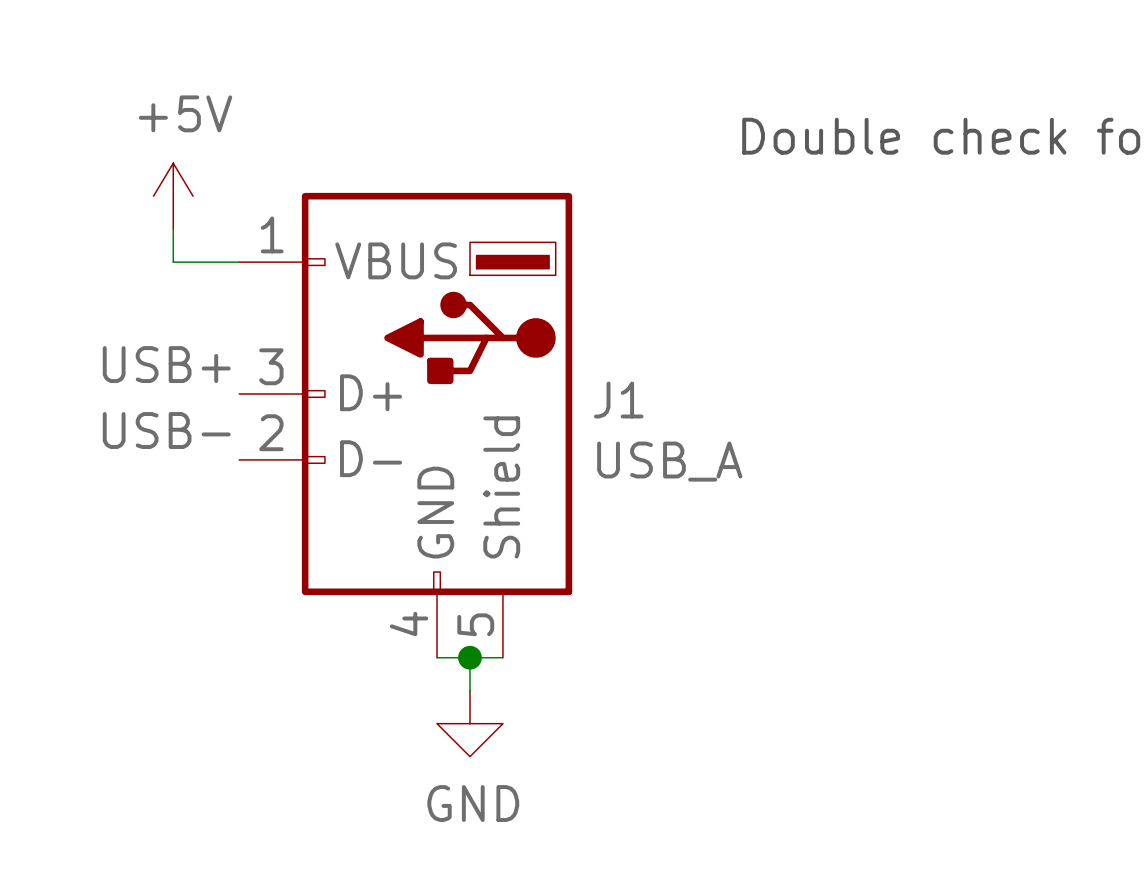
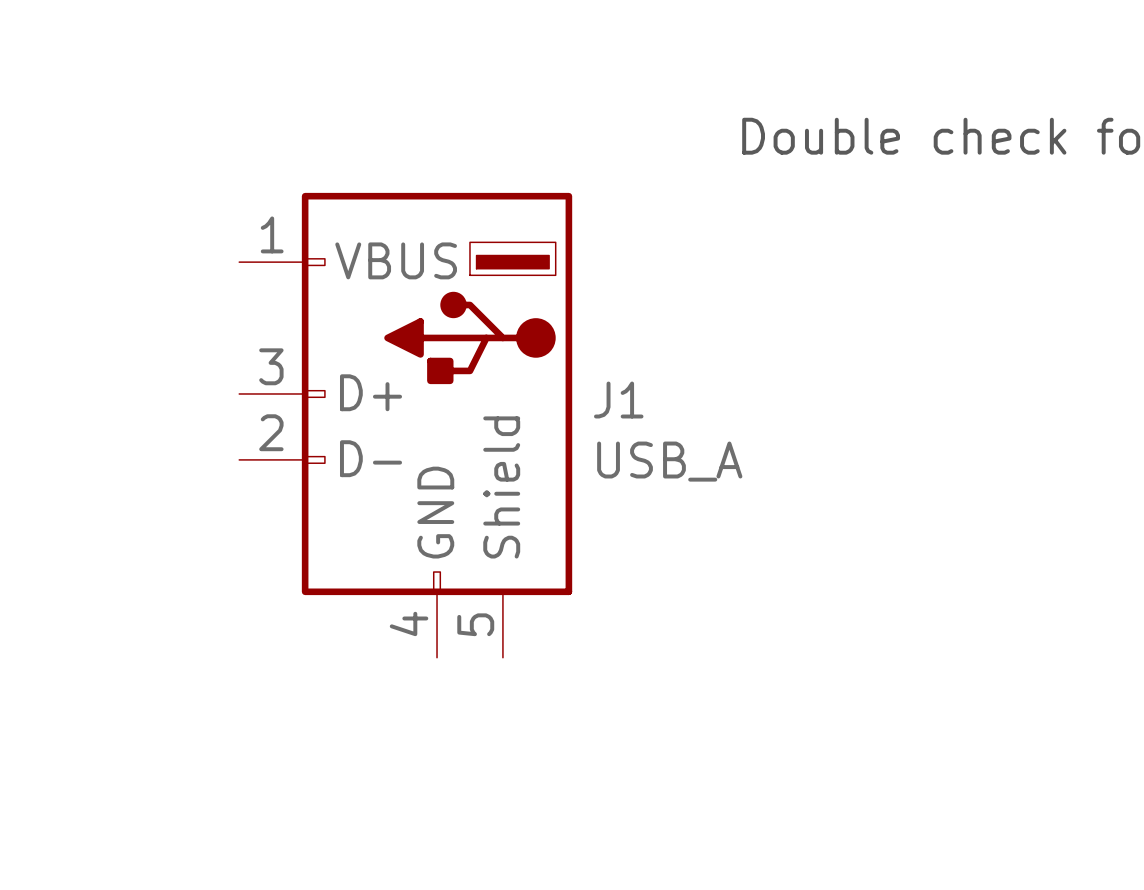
power symbol: +5V (173, 196) -> none
wire: (173, 229) (173, 262) (239, 262) -> none
label: USB+ (166, 364) -> none
label: USB- (166, 430) -> none
wire: (437, 657) (502, 657) -> none
wire: (469, 657) (469, 690) -> none
junction: (469, 657) -> none
power symbol: GND (469, 723) -> none

